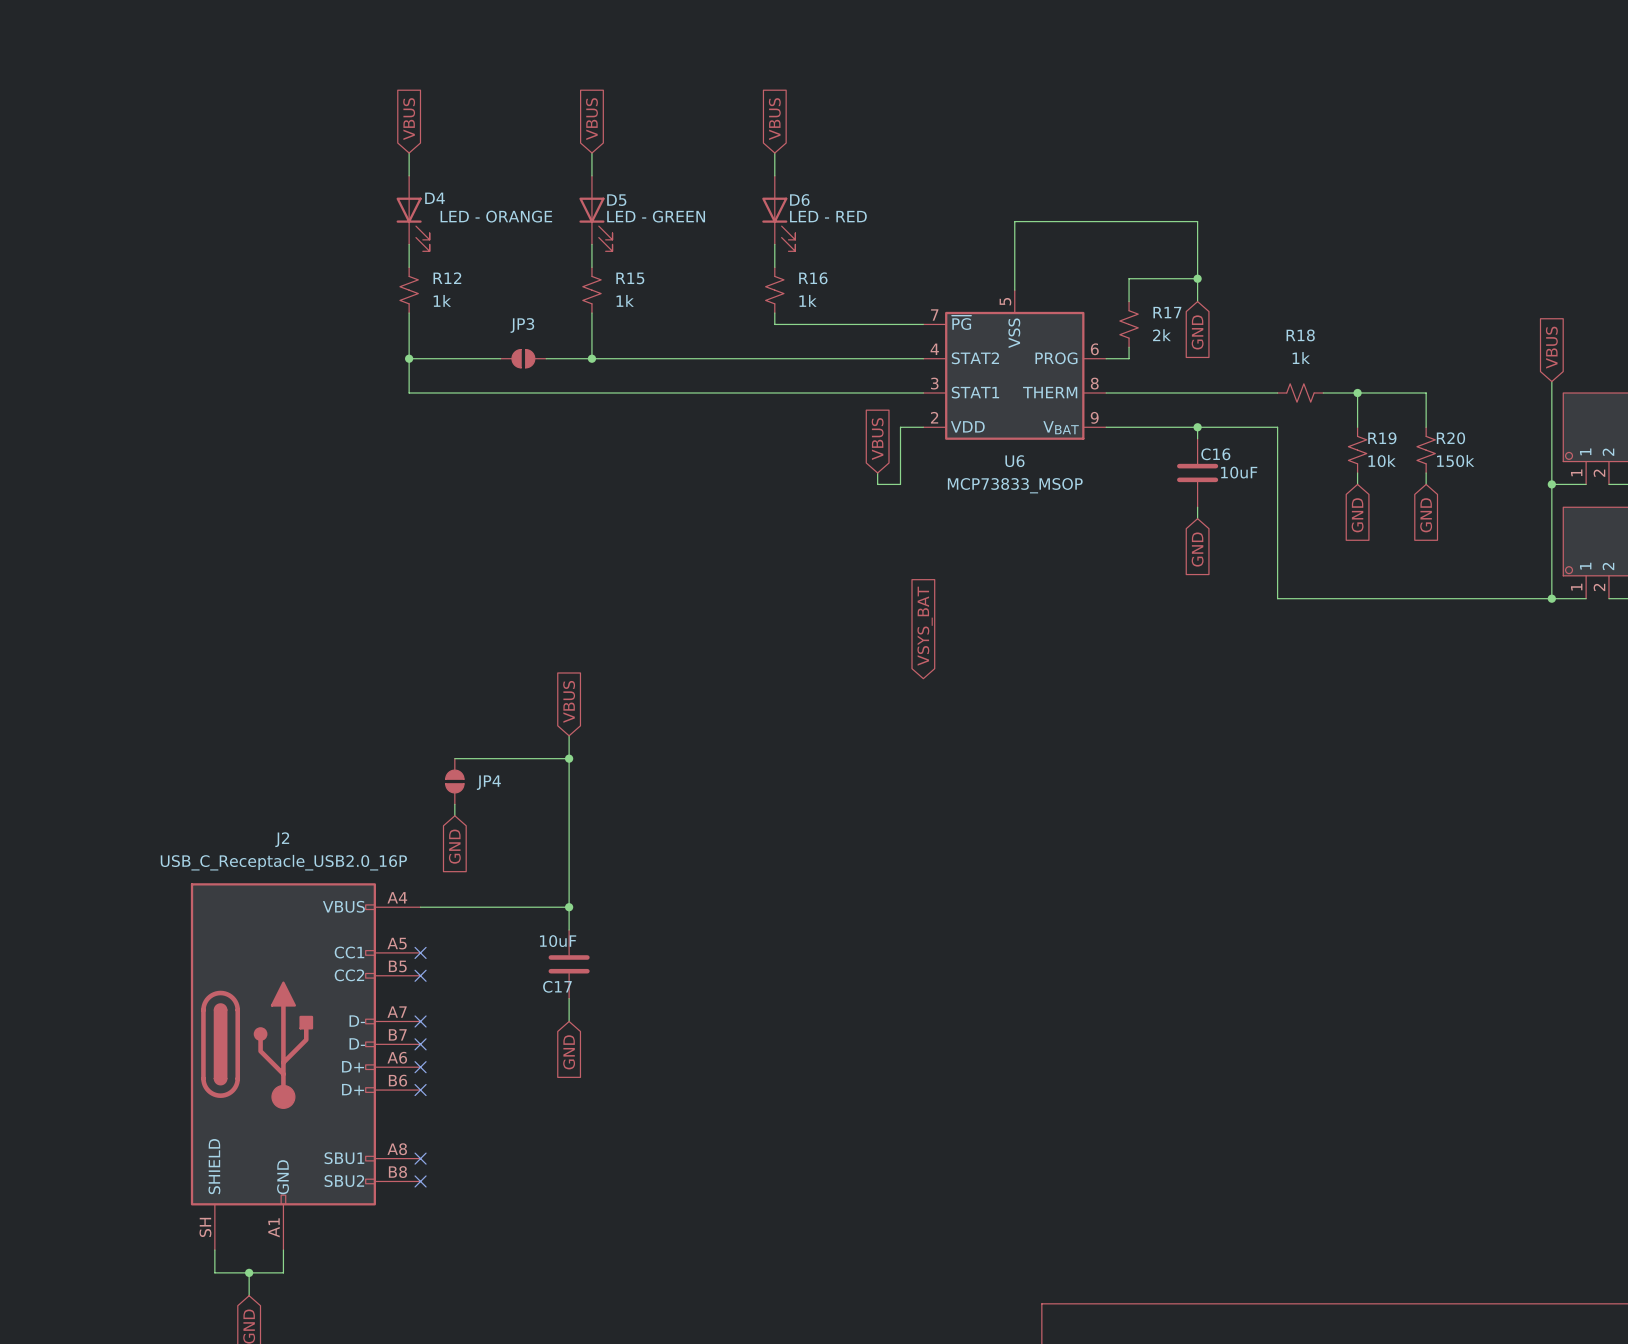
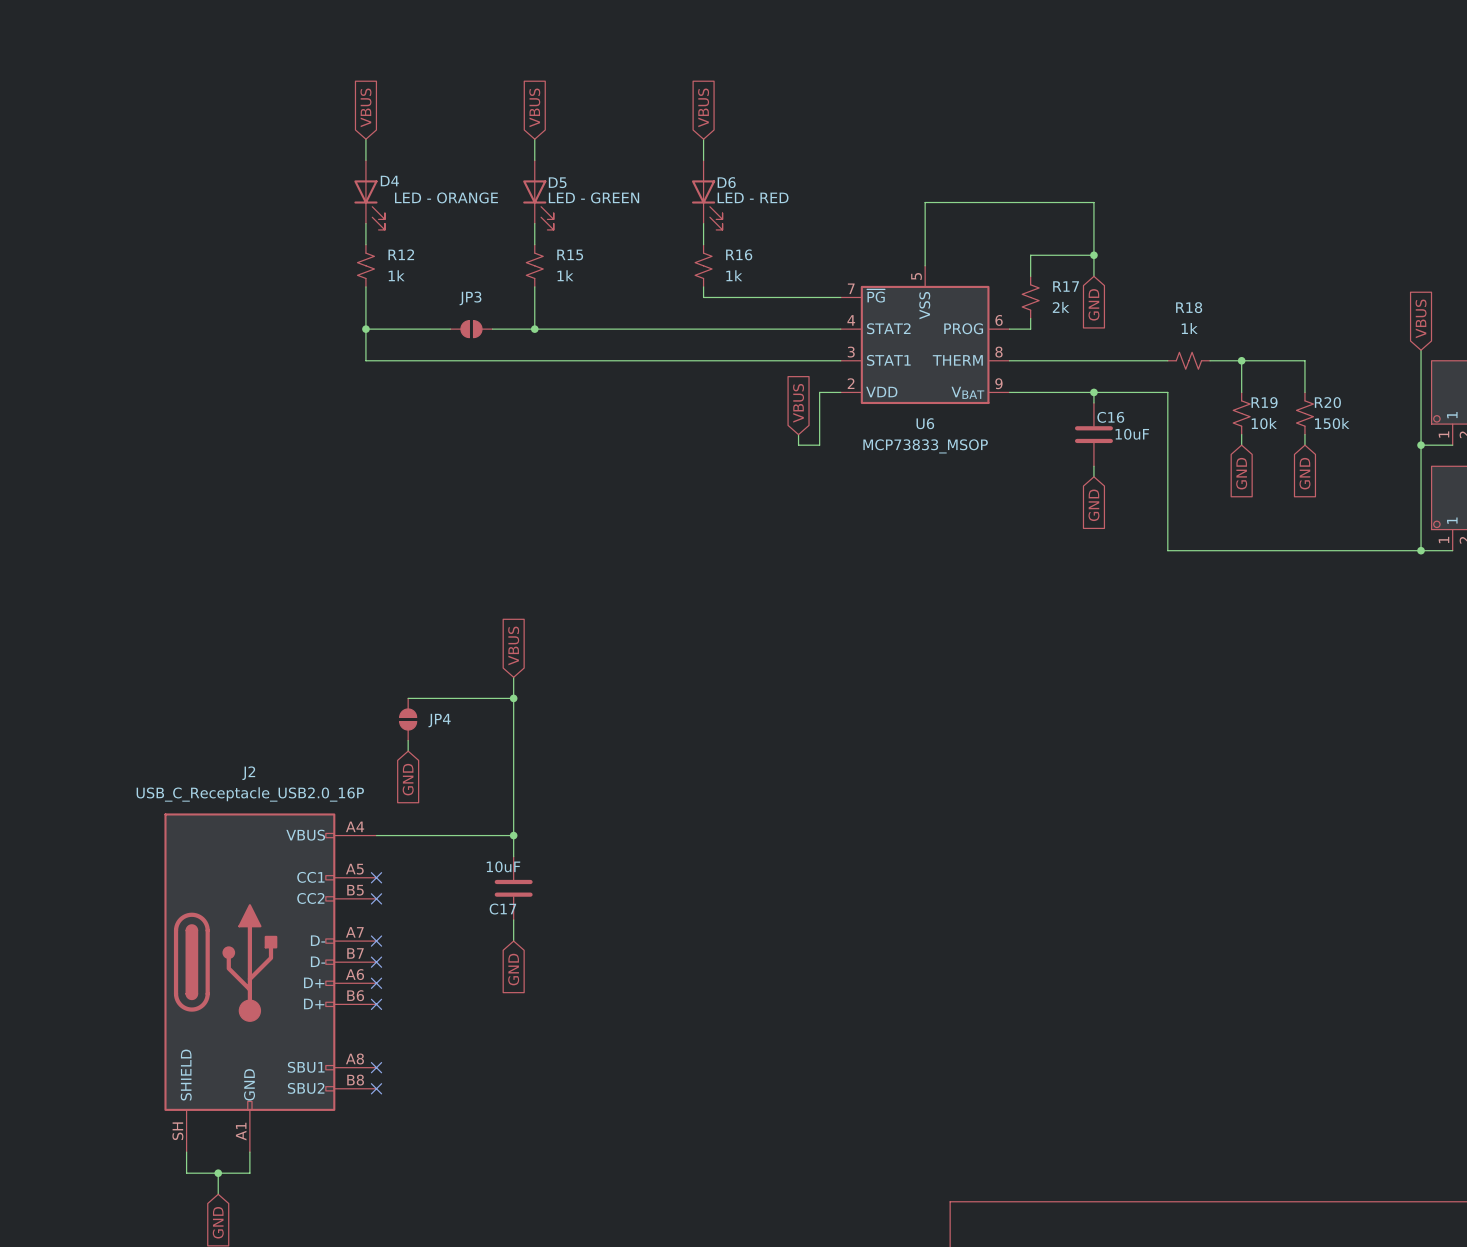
global label: VSYS_BAT (925, 626) -> none

